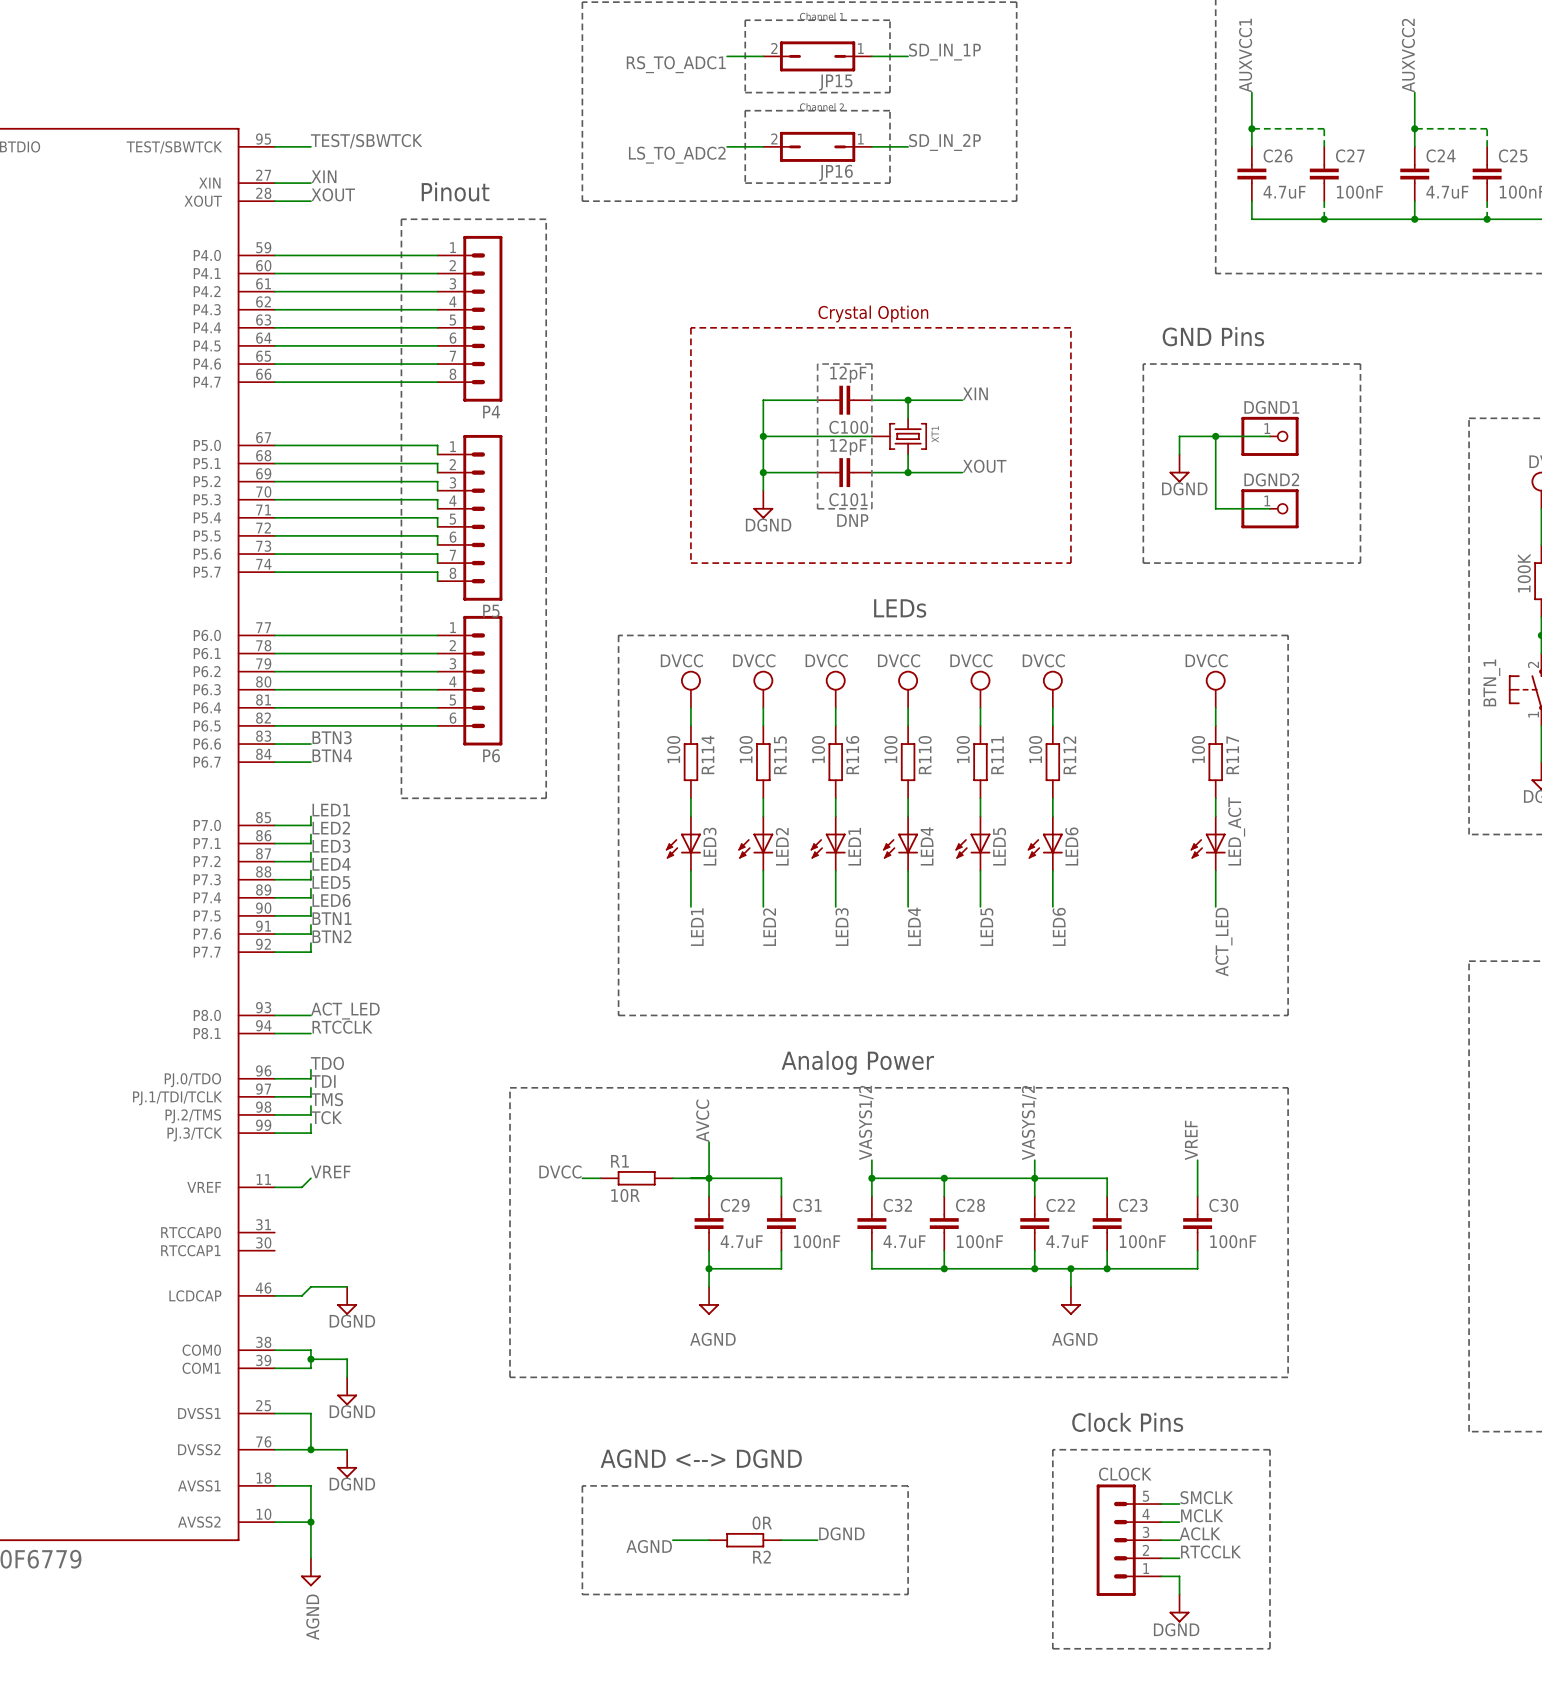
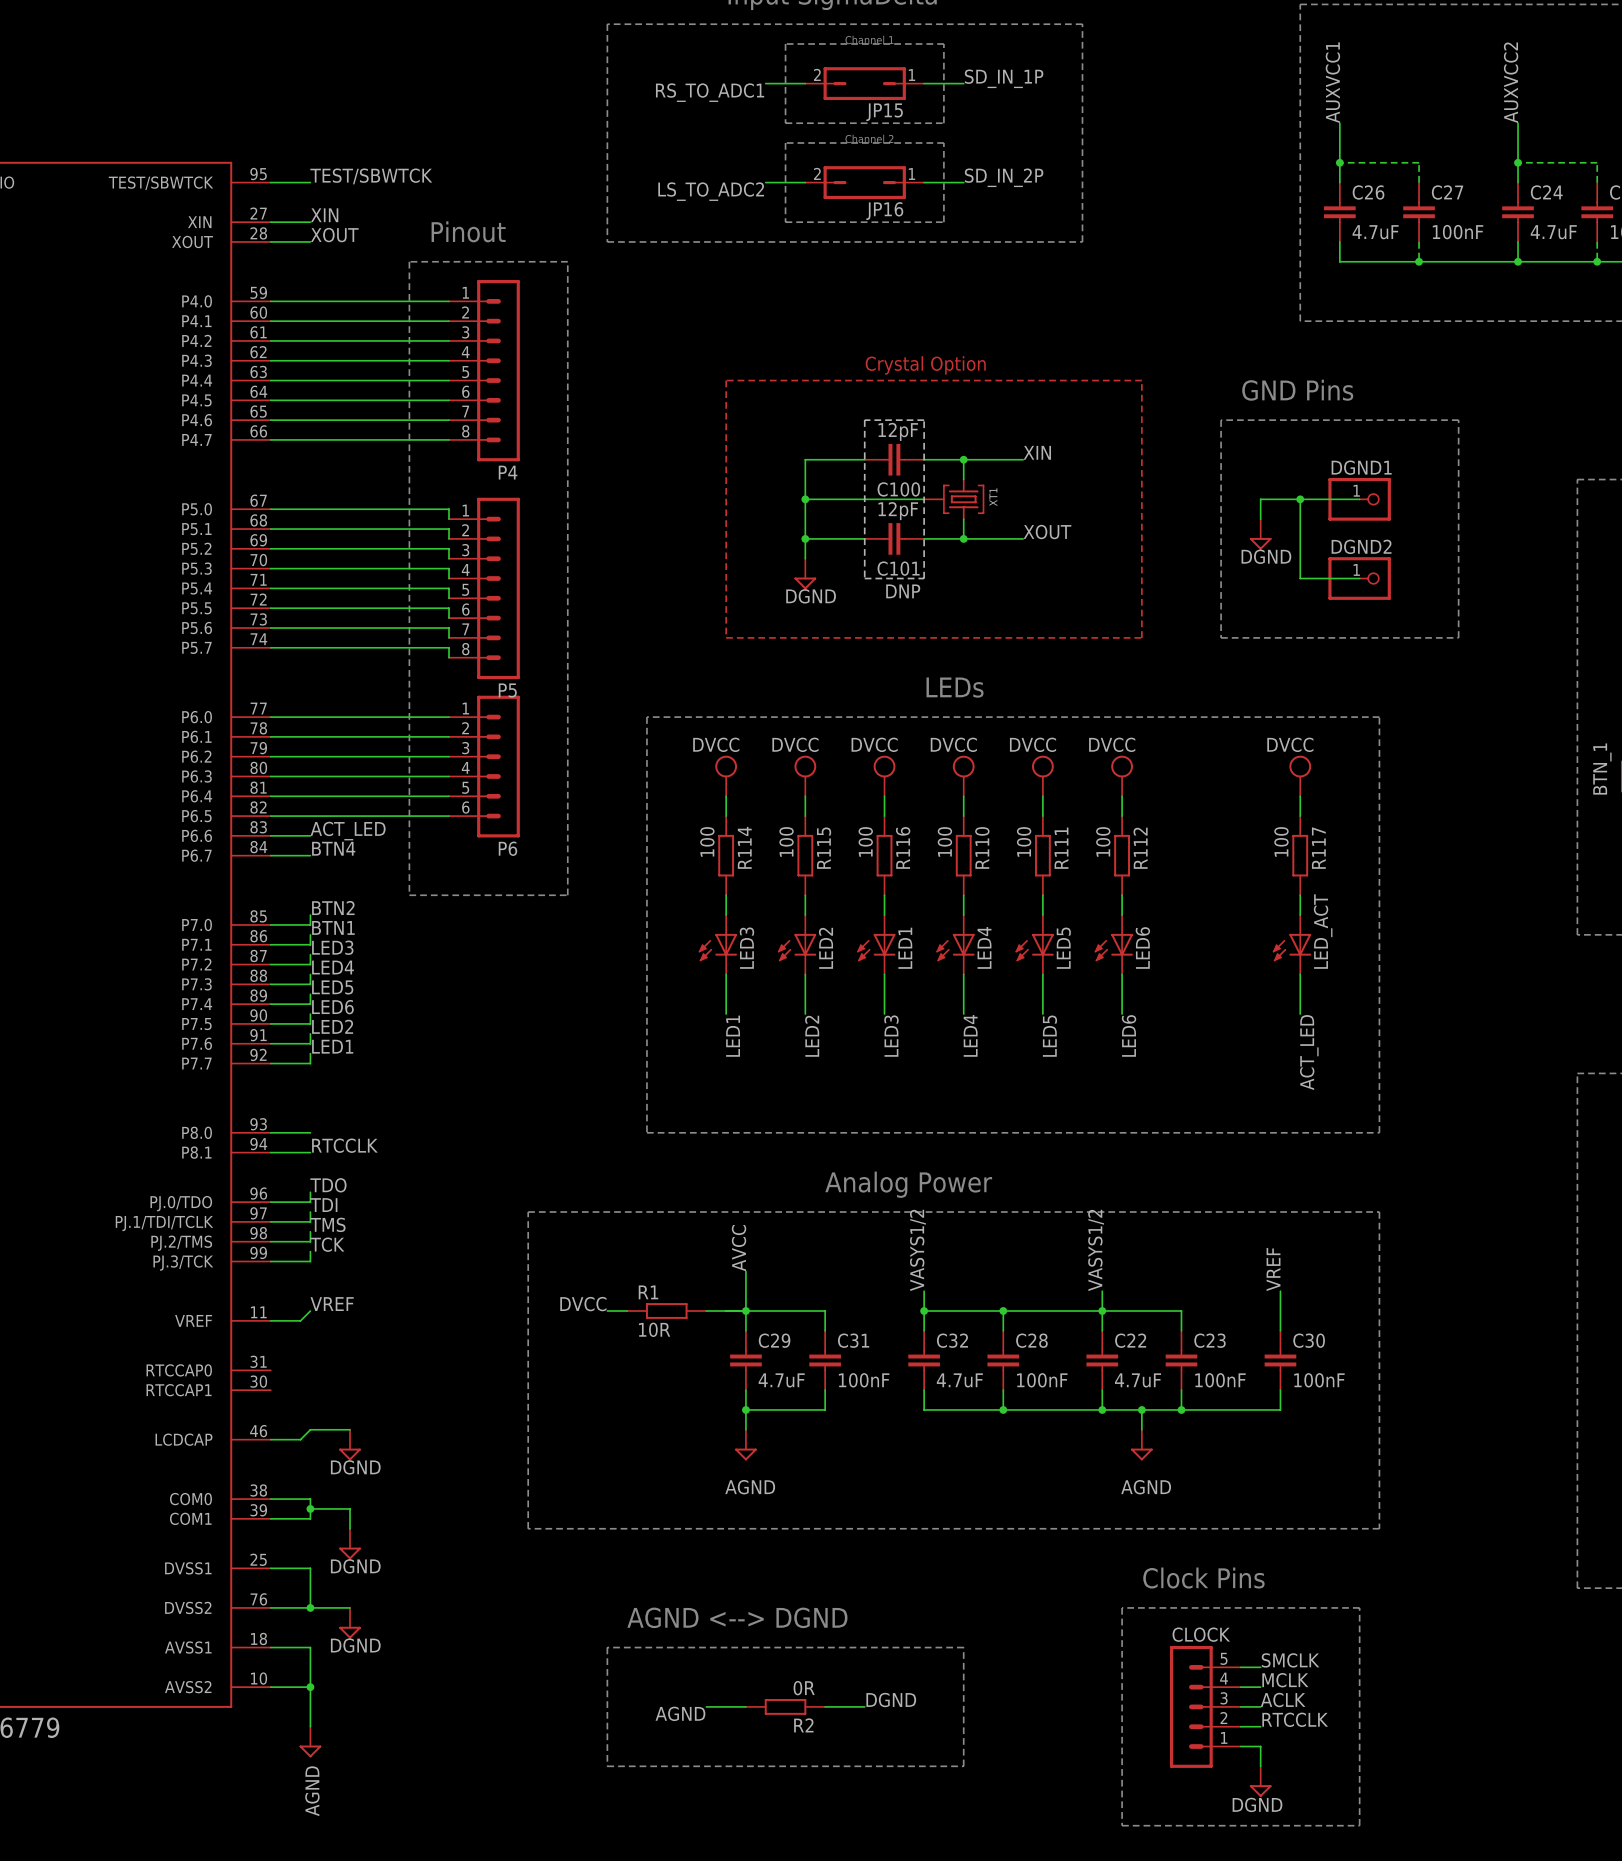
label: BTN3 (332, 737) -> ACT_LED (348, 831)
label: LED1 (331, 810) -> BTN2 (333, 908)
label: LED2 (331, 828) -> BTN1 (333, 927)
label: BTN1 (331, 918) -> LED2 (332, 1026)
label: BTN2 (331, 936) -> LED1 (332, 1046)
label: ACT_LED (345, 1011) -> none

